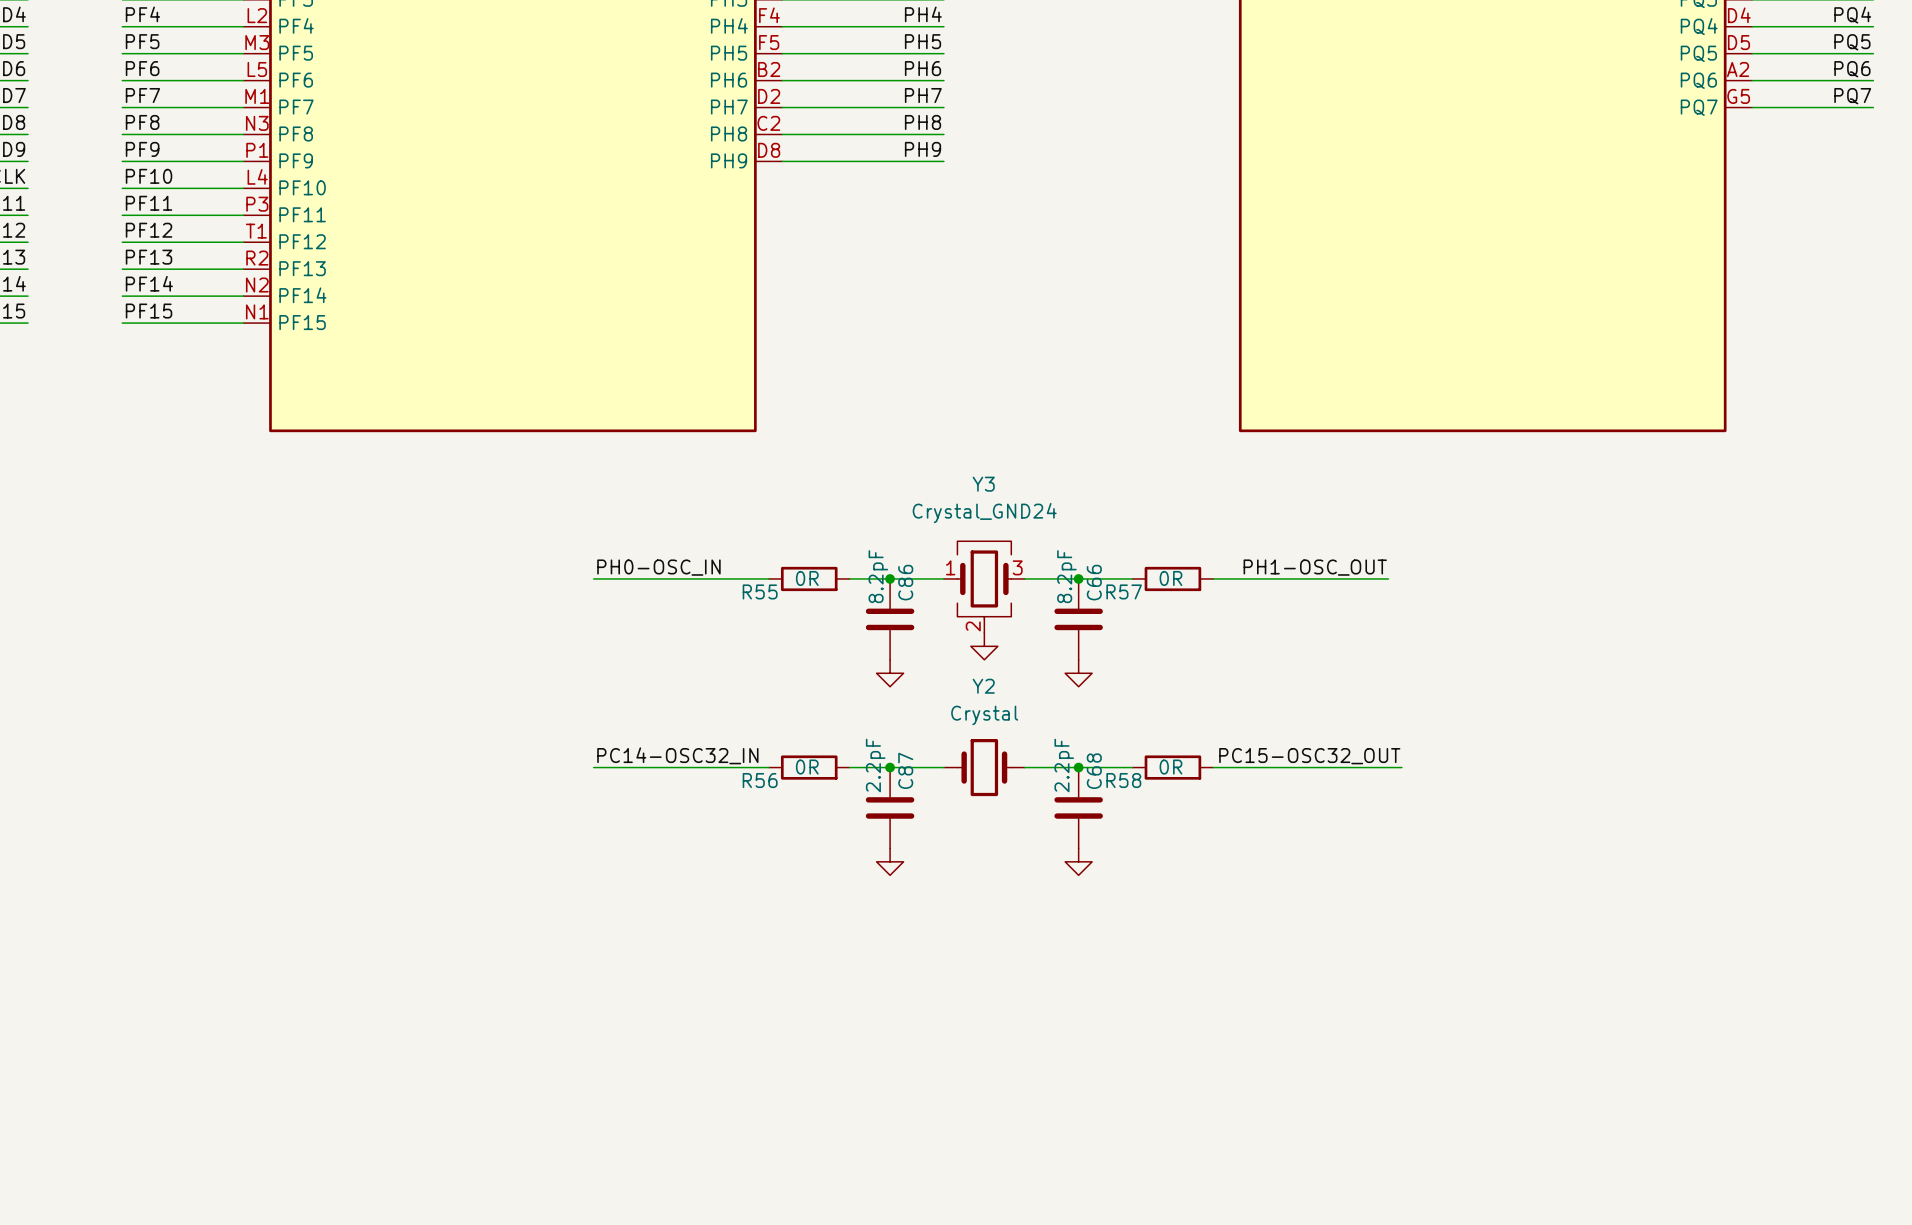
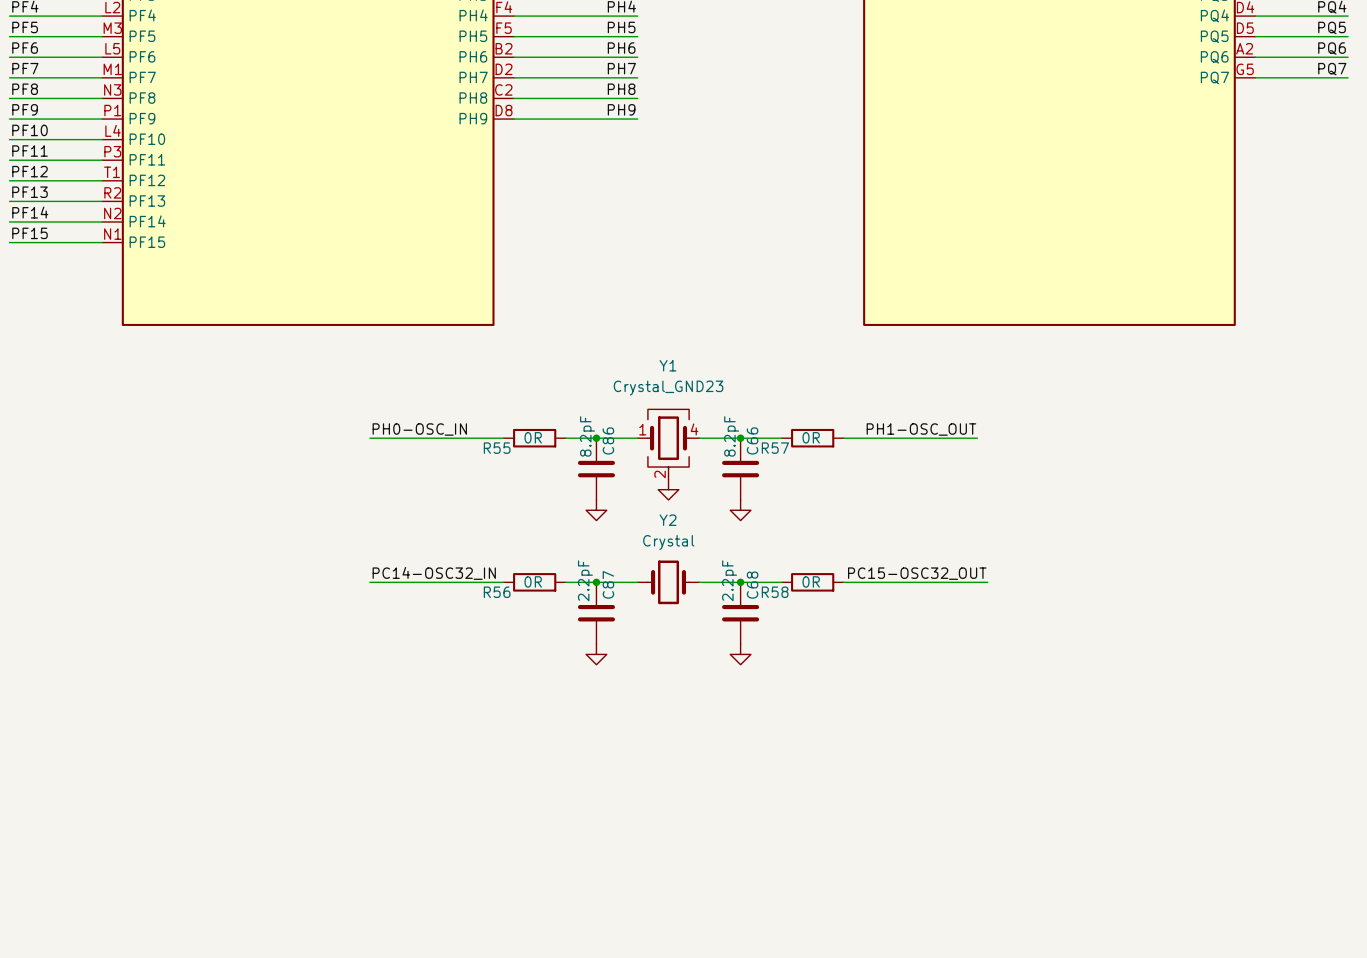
Y3 name: Y3 (983, 484) -> Y1 (668, 365)
Y3 value: Crystal_GND24 (984, 513) -> Crystal_GND23 (668, 388)
Y3 pin number: 3 (1017, 567) -> 4 (694, 429)

